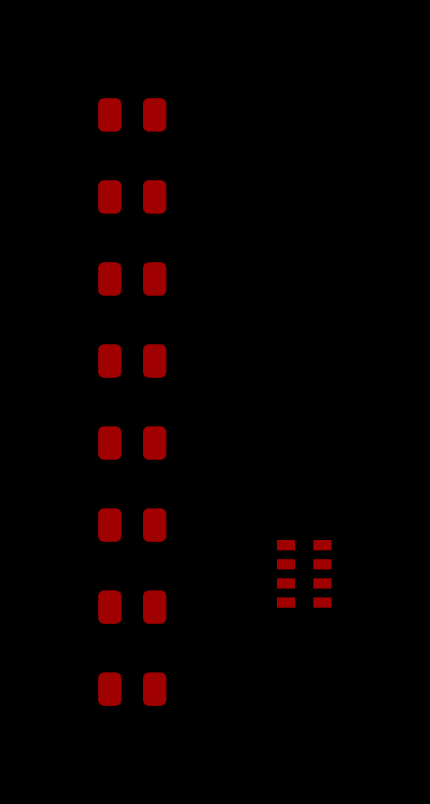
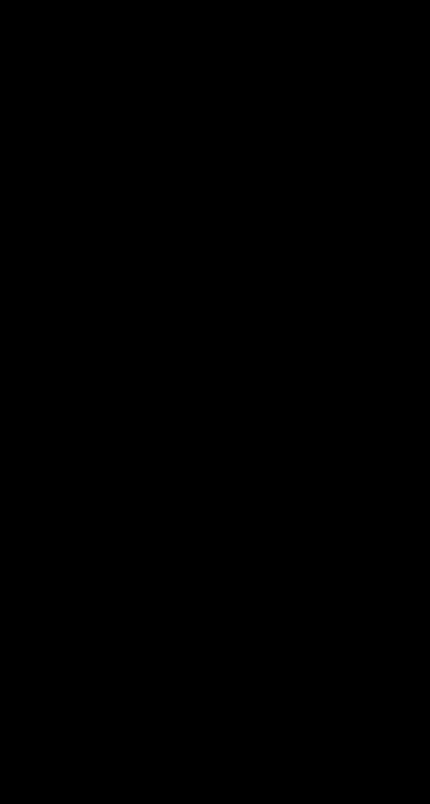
part: (132, 402) -> none
part: (304, 573) -> none

